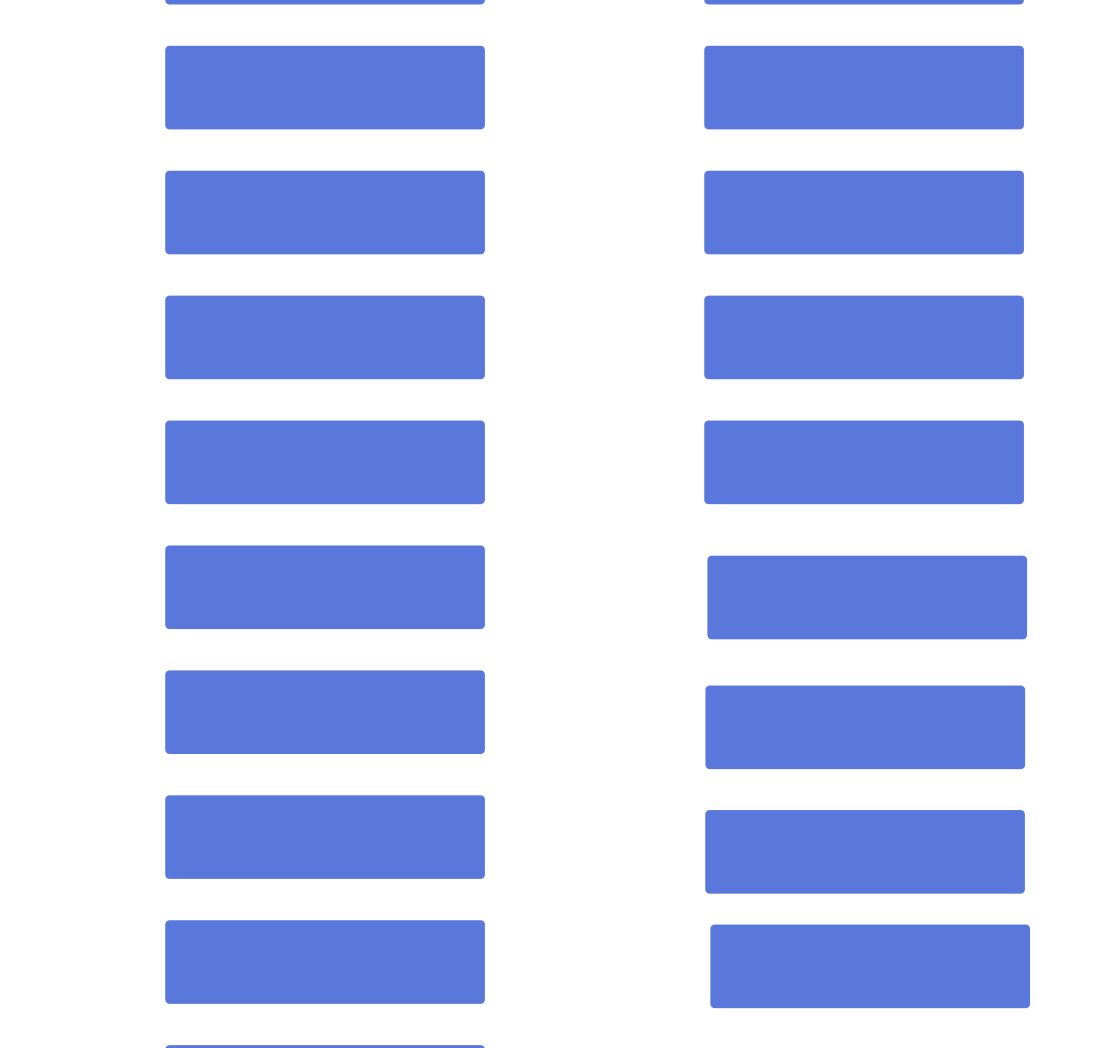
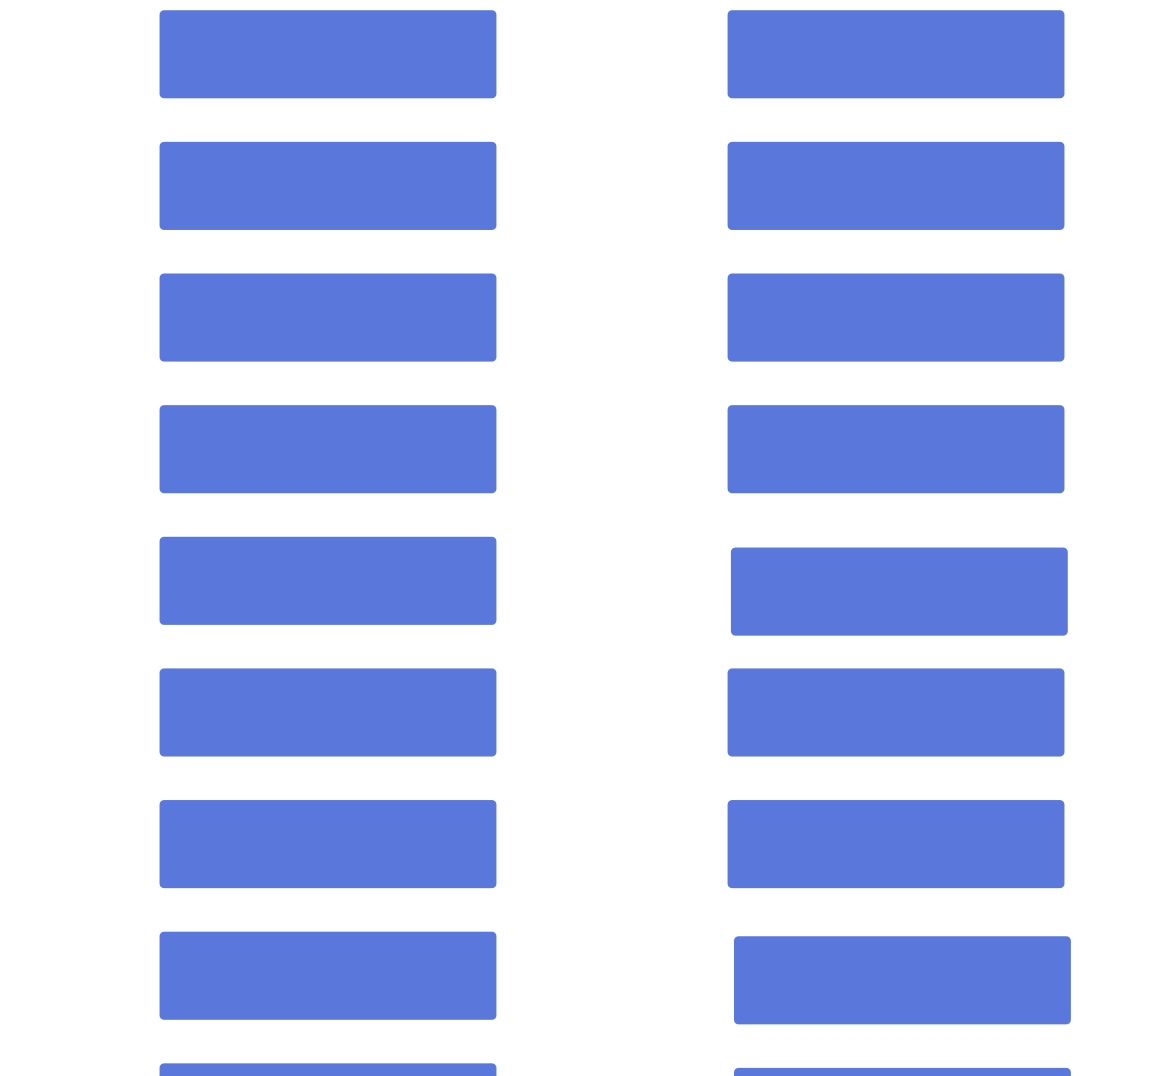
part position: (865, 727) -> (896, 712)
part position: (865, 851) -> (896, 844)

